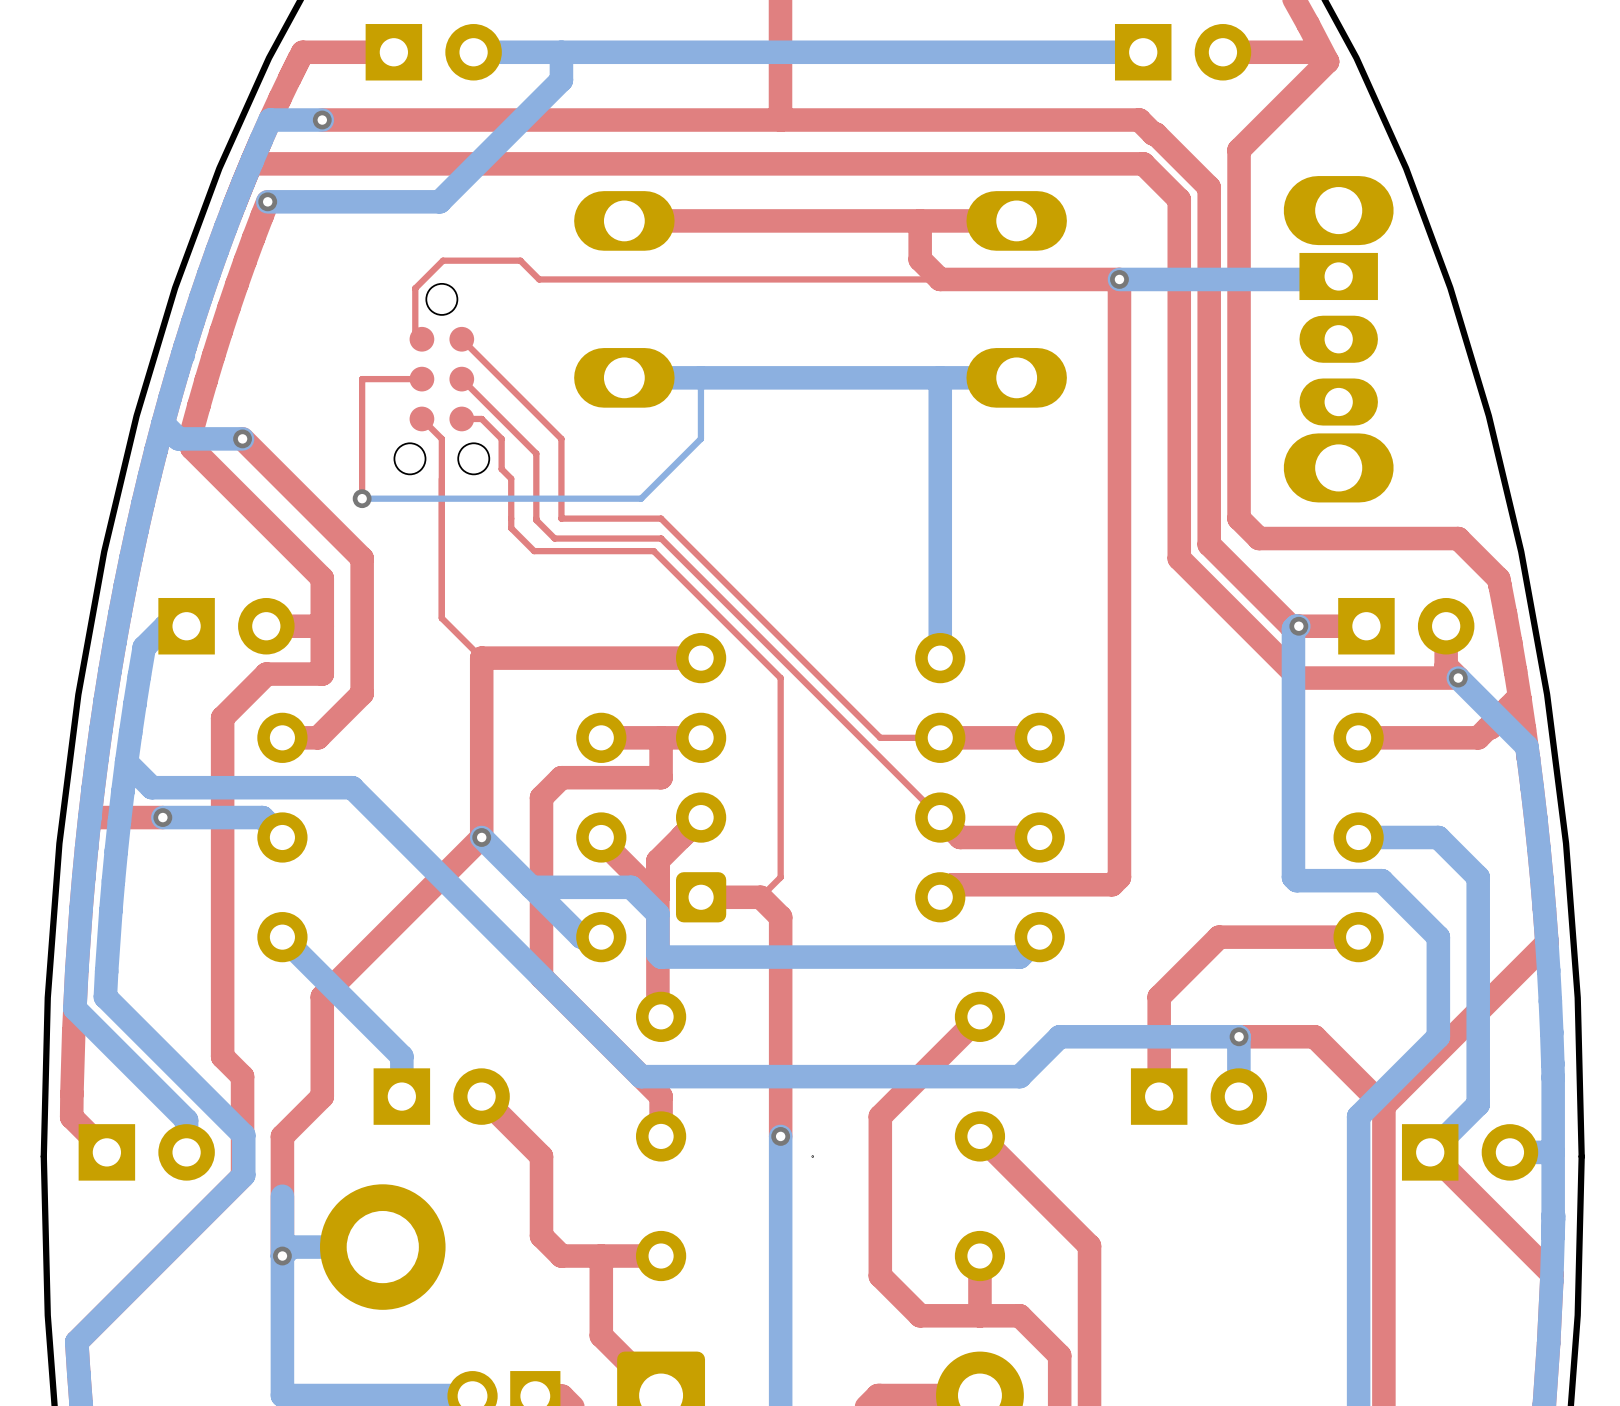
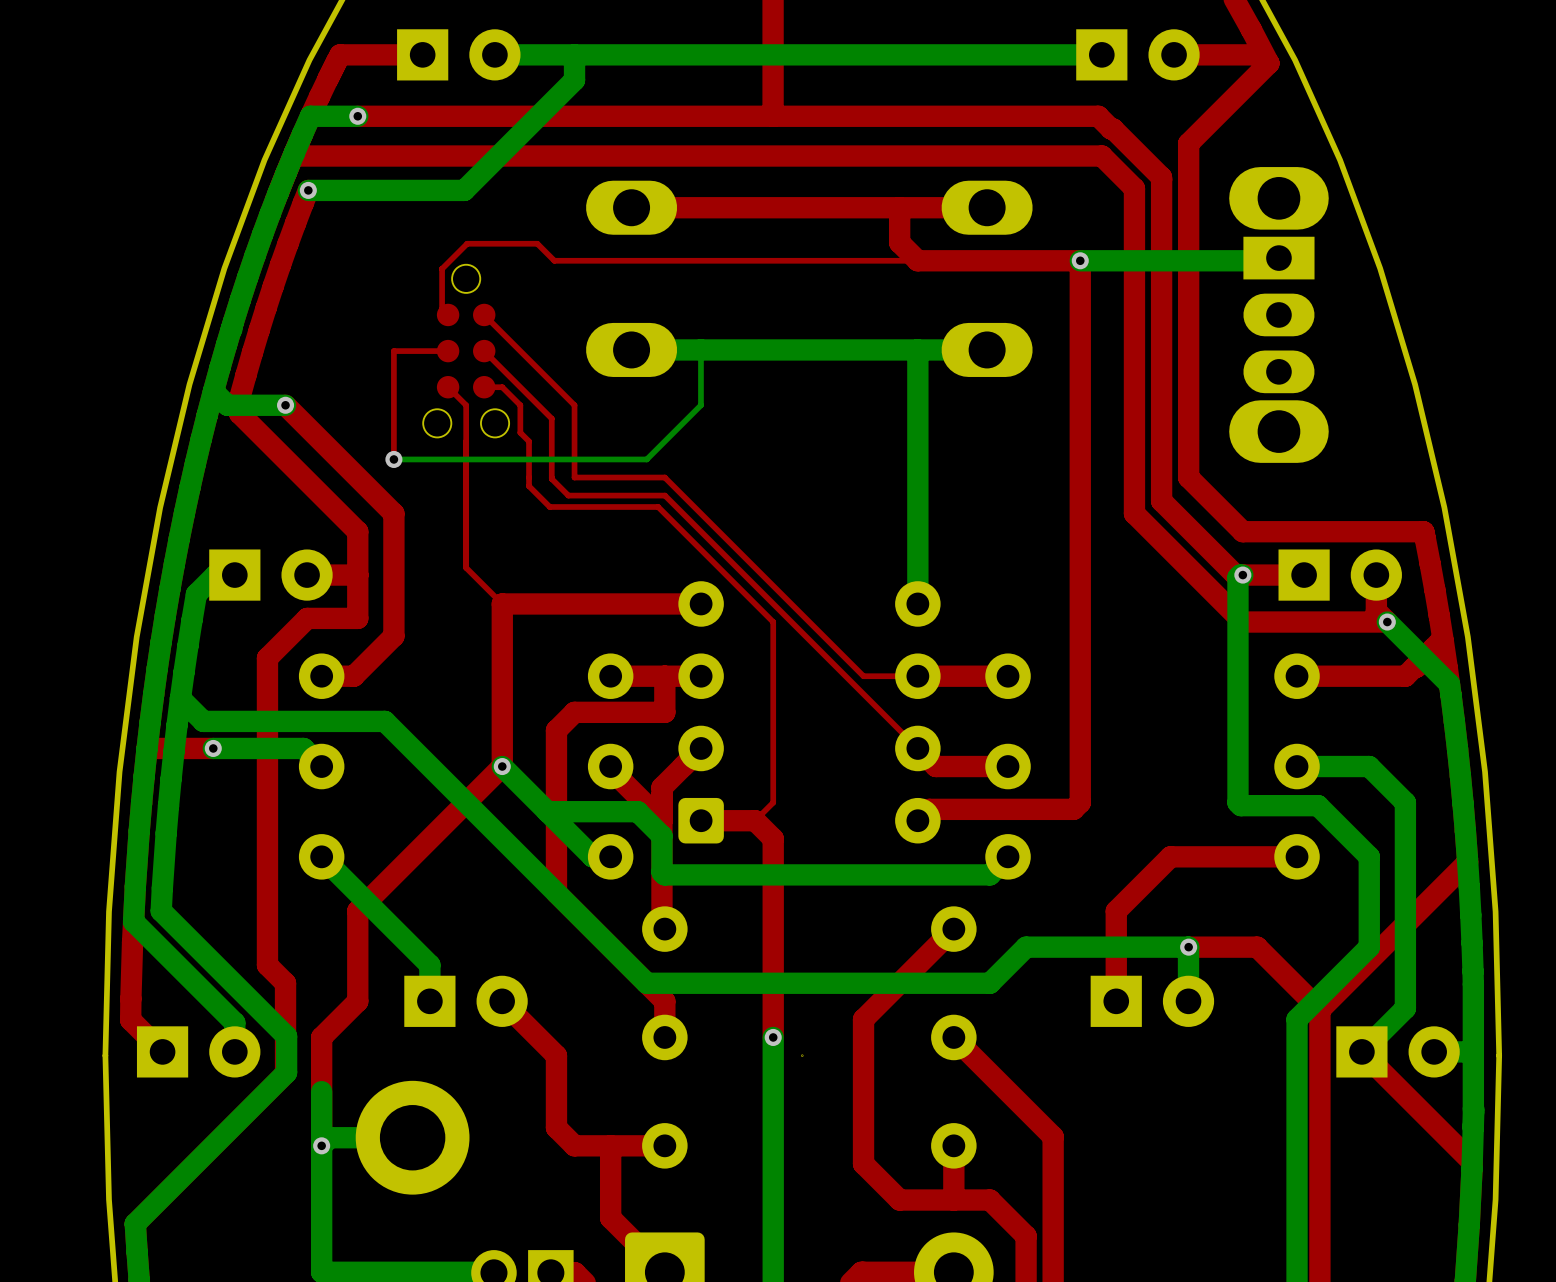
top track: (1258, 538) (1458, 538) (1498, 578) -> (1206, 495) (1242, 531) (1423, 531)

